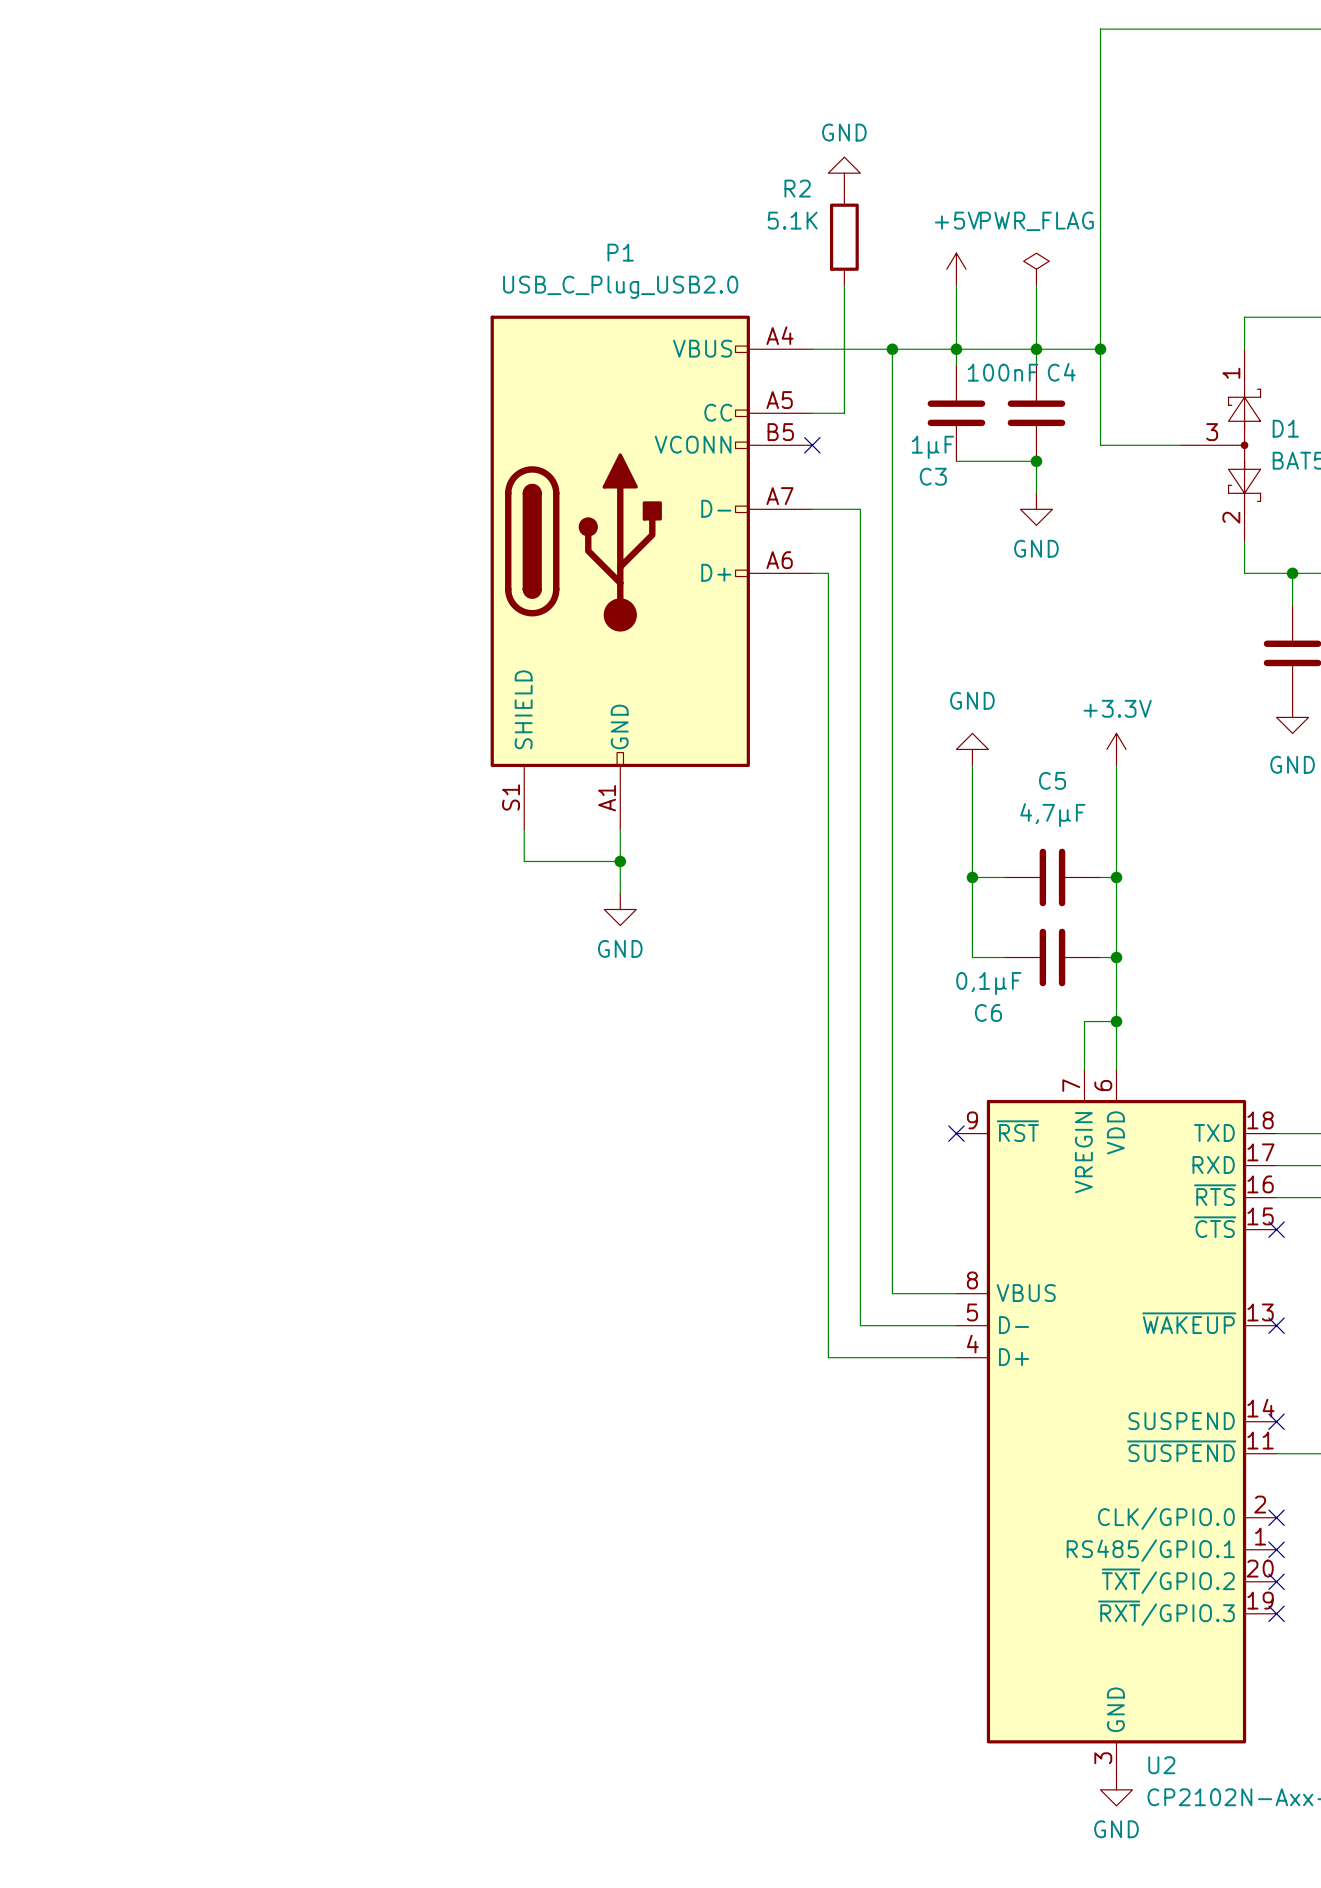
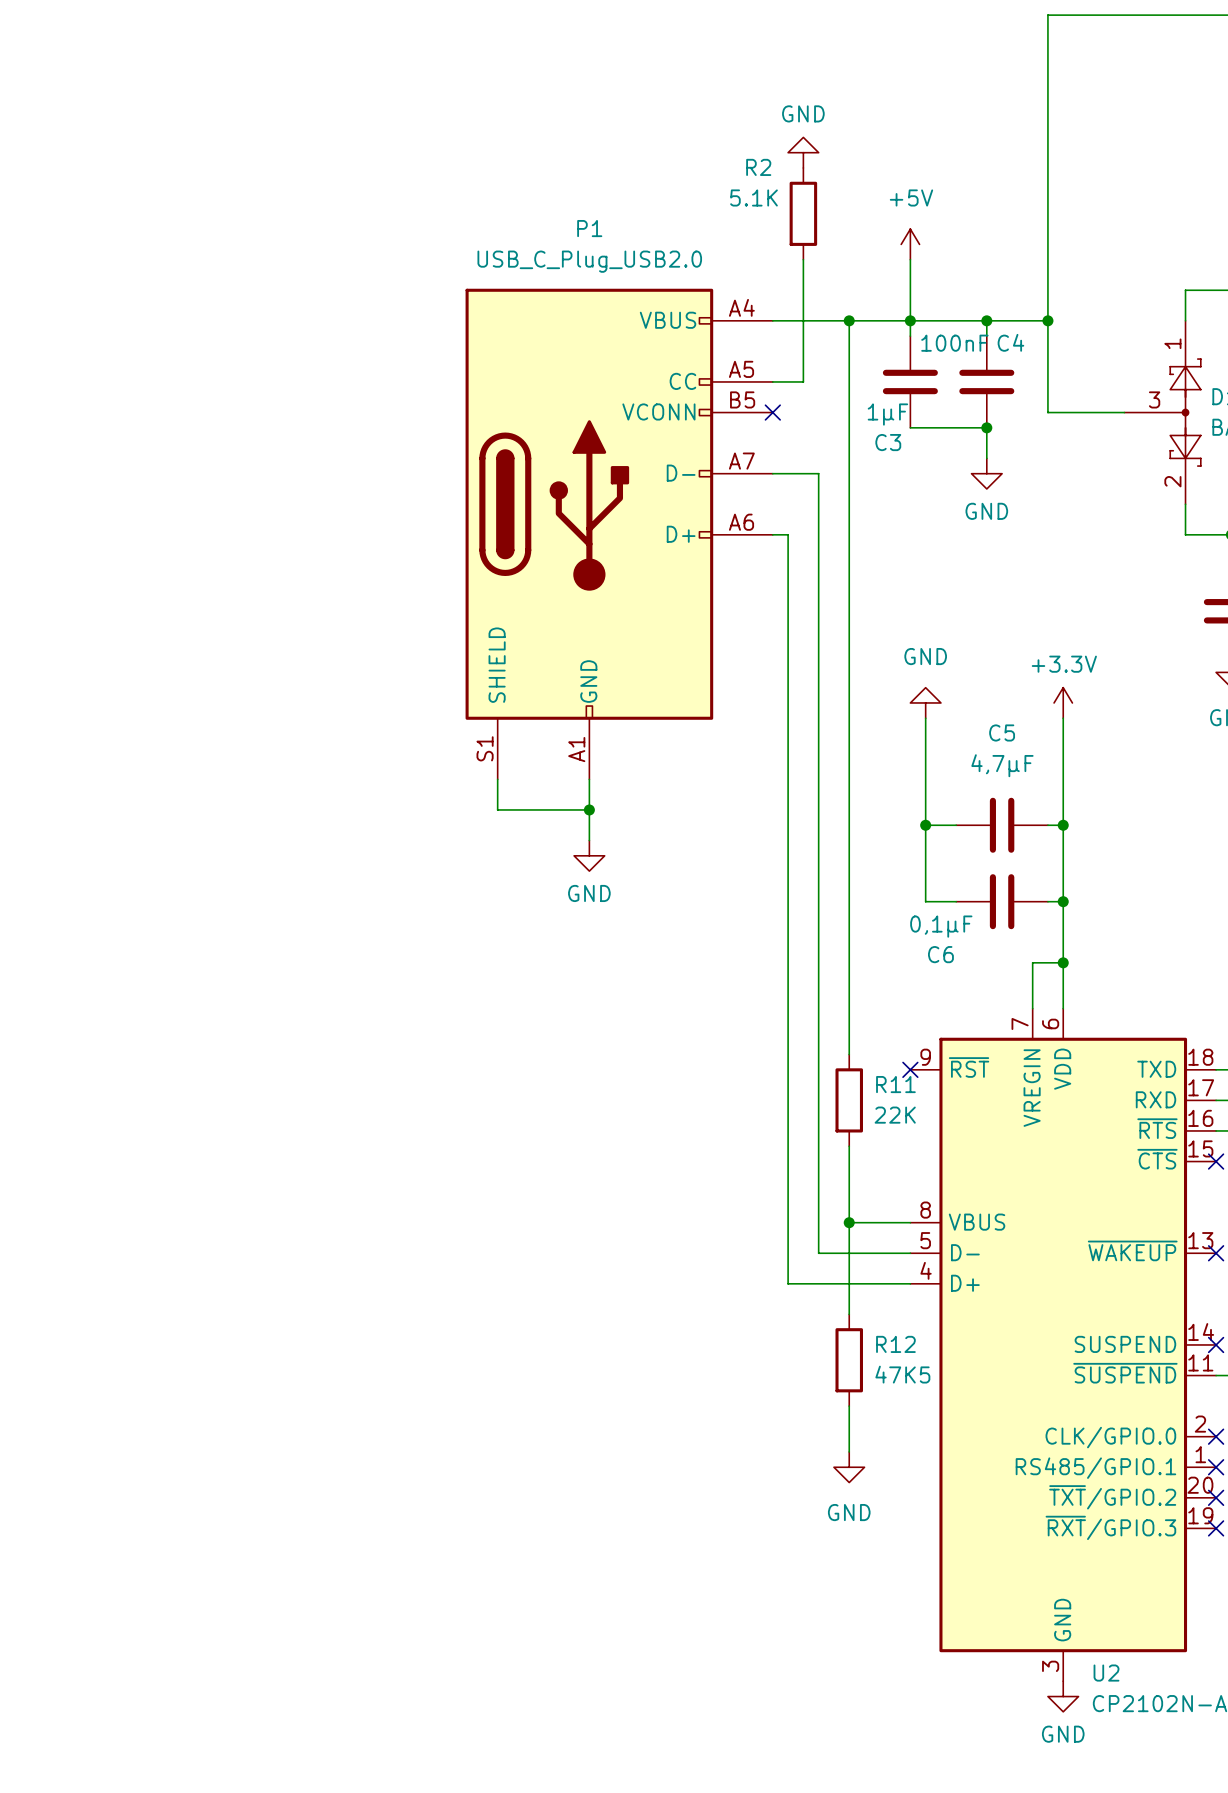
power symbol: PWR_FLAG (1036, 269) -> none
wire: (1036, 285) (1036, 349) -> none
wire: (892, 1117) (892, 1213) -> (849, 1222) (849, 1314)
R11: none -> 22K (849, 1100)
junction: none -> (849, 1222)
R12: none -> 47K5 (849, 1360)
wire: none -> (849, 1406) (849, 1451)
power symbol: none -> GND (849, 1467)

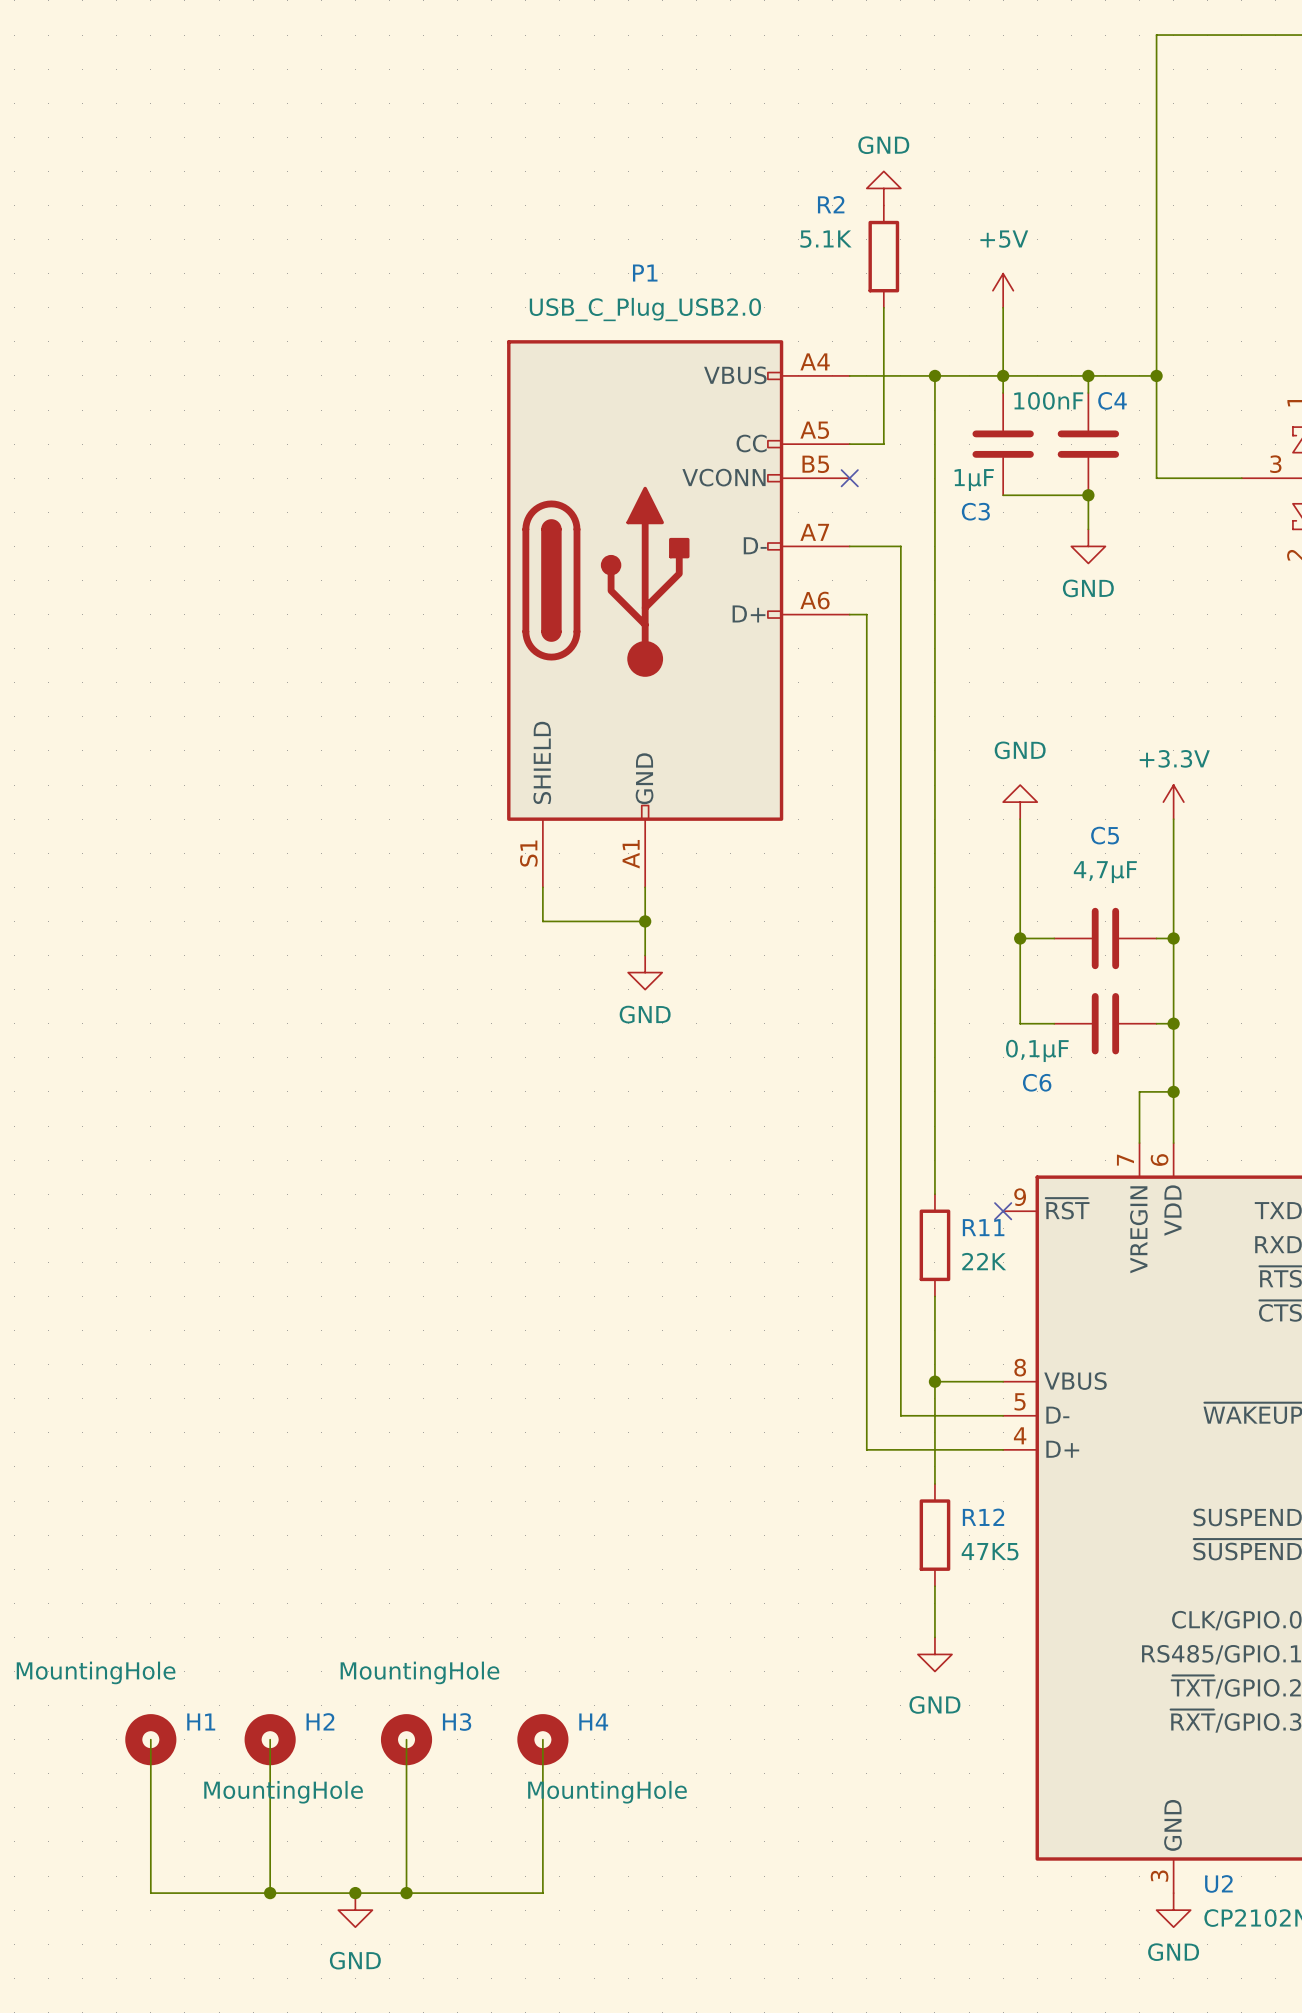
wire: none -> (150, 1739) (150, 1893) (542, 1893) (542, 1739)
H1: none -> MountingHole (150, 1739)
wire: none -> (270, 1739) (270, 1893)
H2: none -> MountingHole (270, 1739)
wire: none -> (406, 1739) (406, 1893)
H3: none -> MountingHole (406, 1739)
H4: none -> MountingHole (542, 1739)
junction: none -> (270, 1893)
junction: none -> (355, 1893)
junction: none -> (406, 1893)
power symbol: none -> GND (355, 1910)

